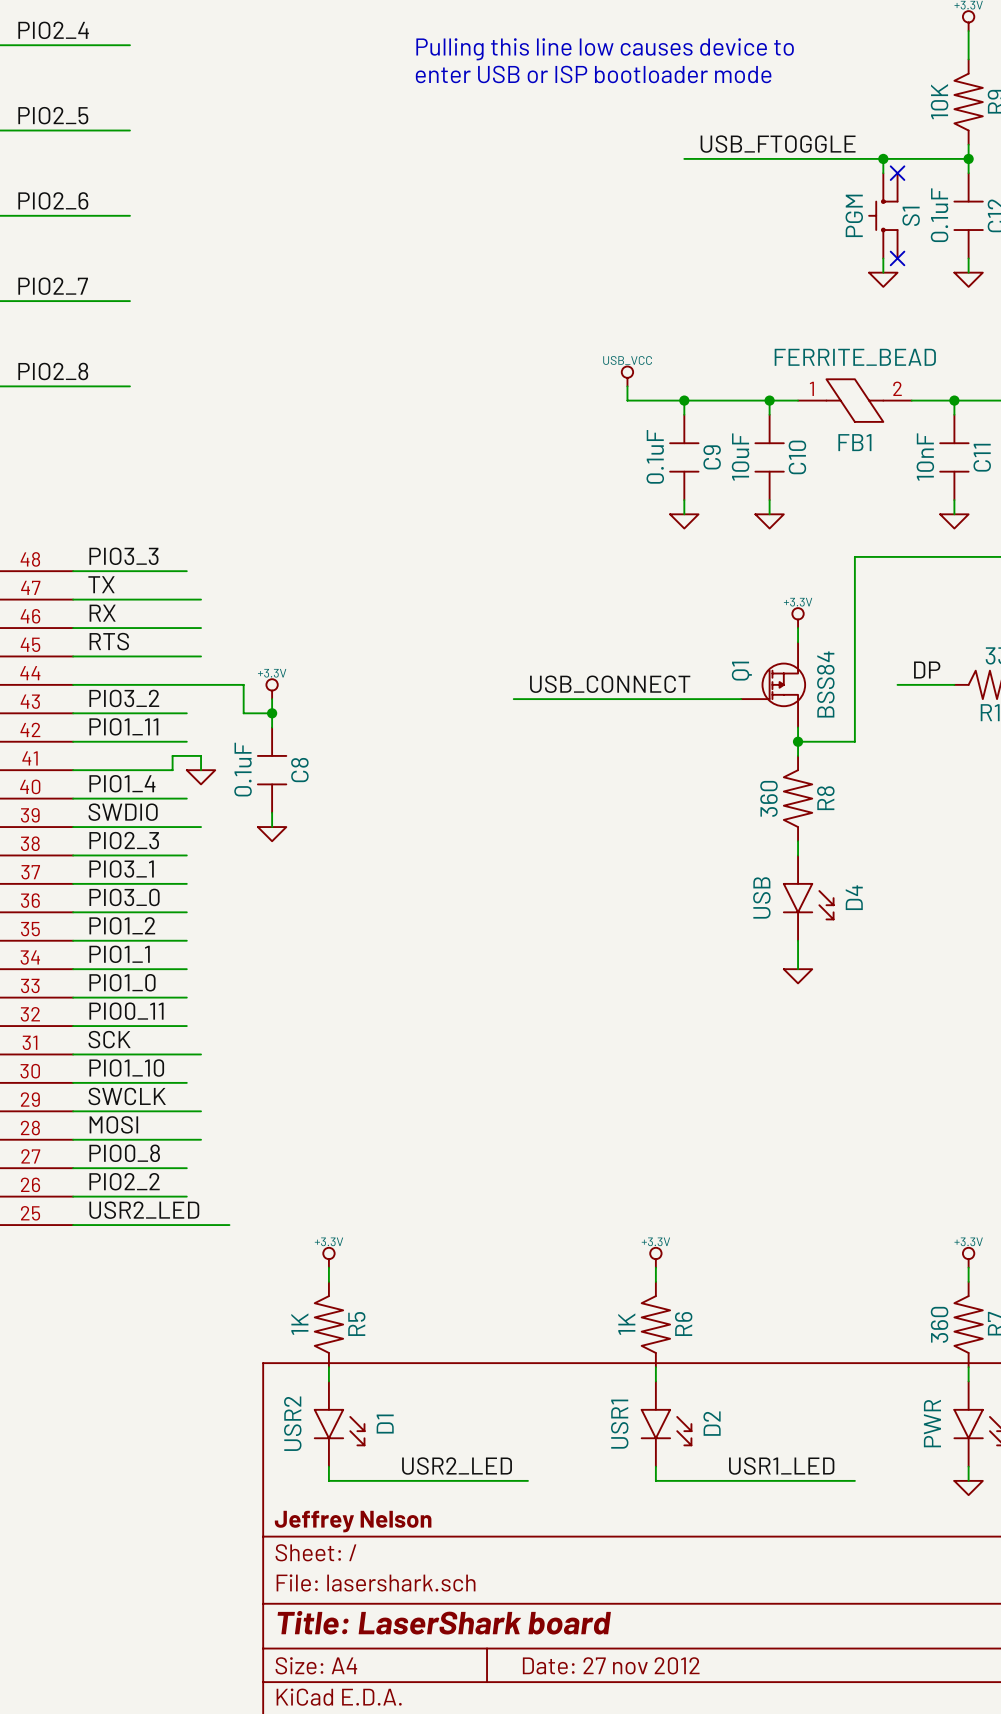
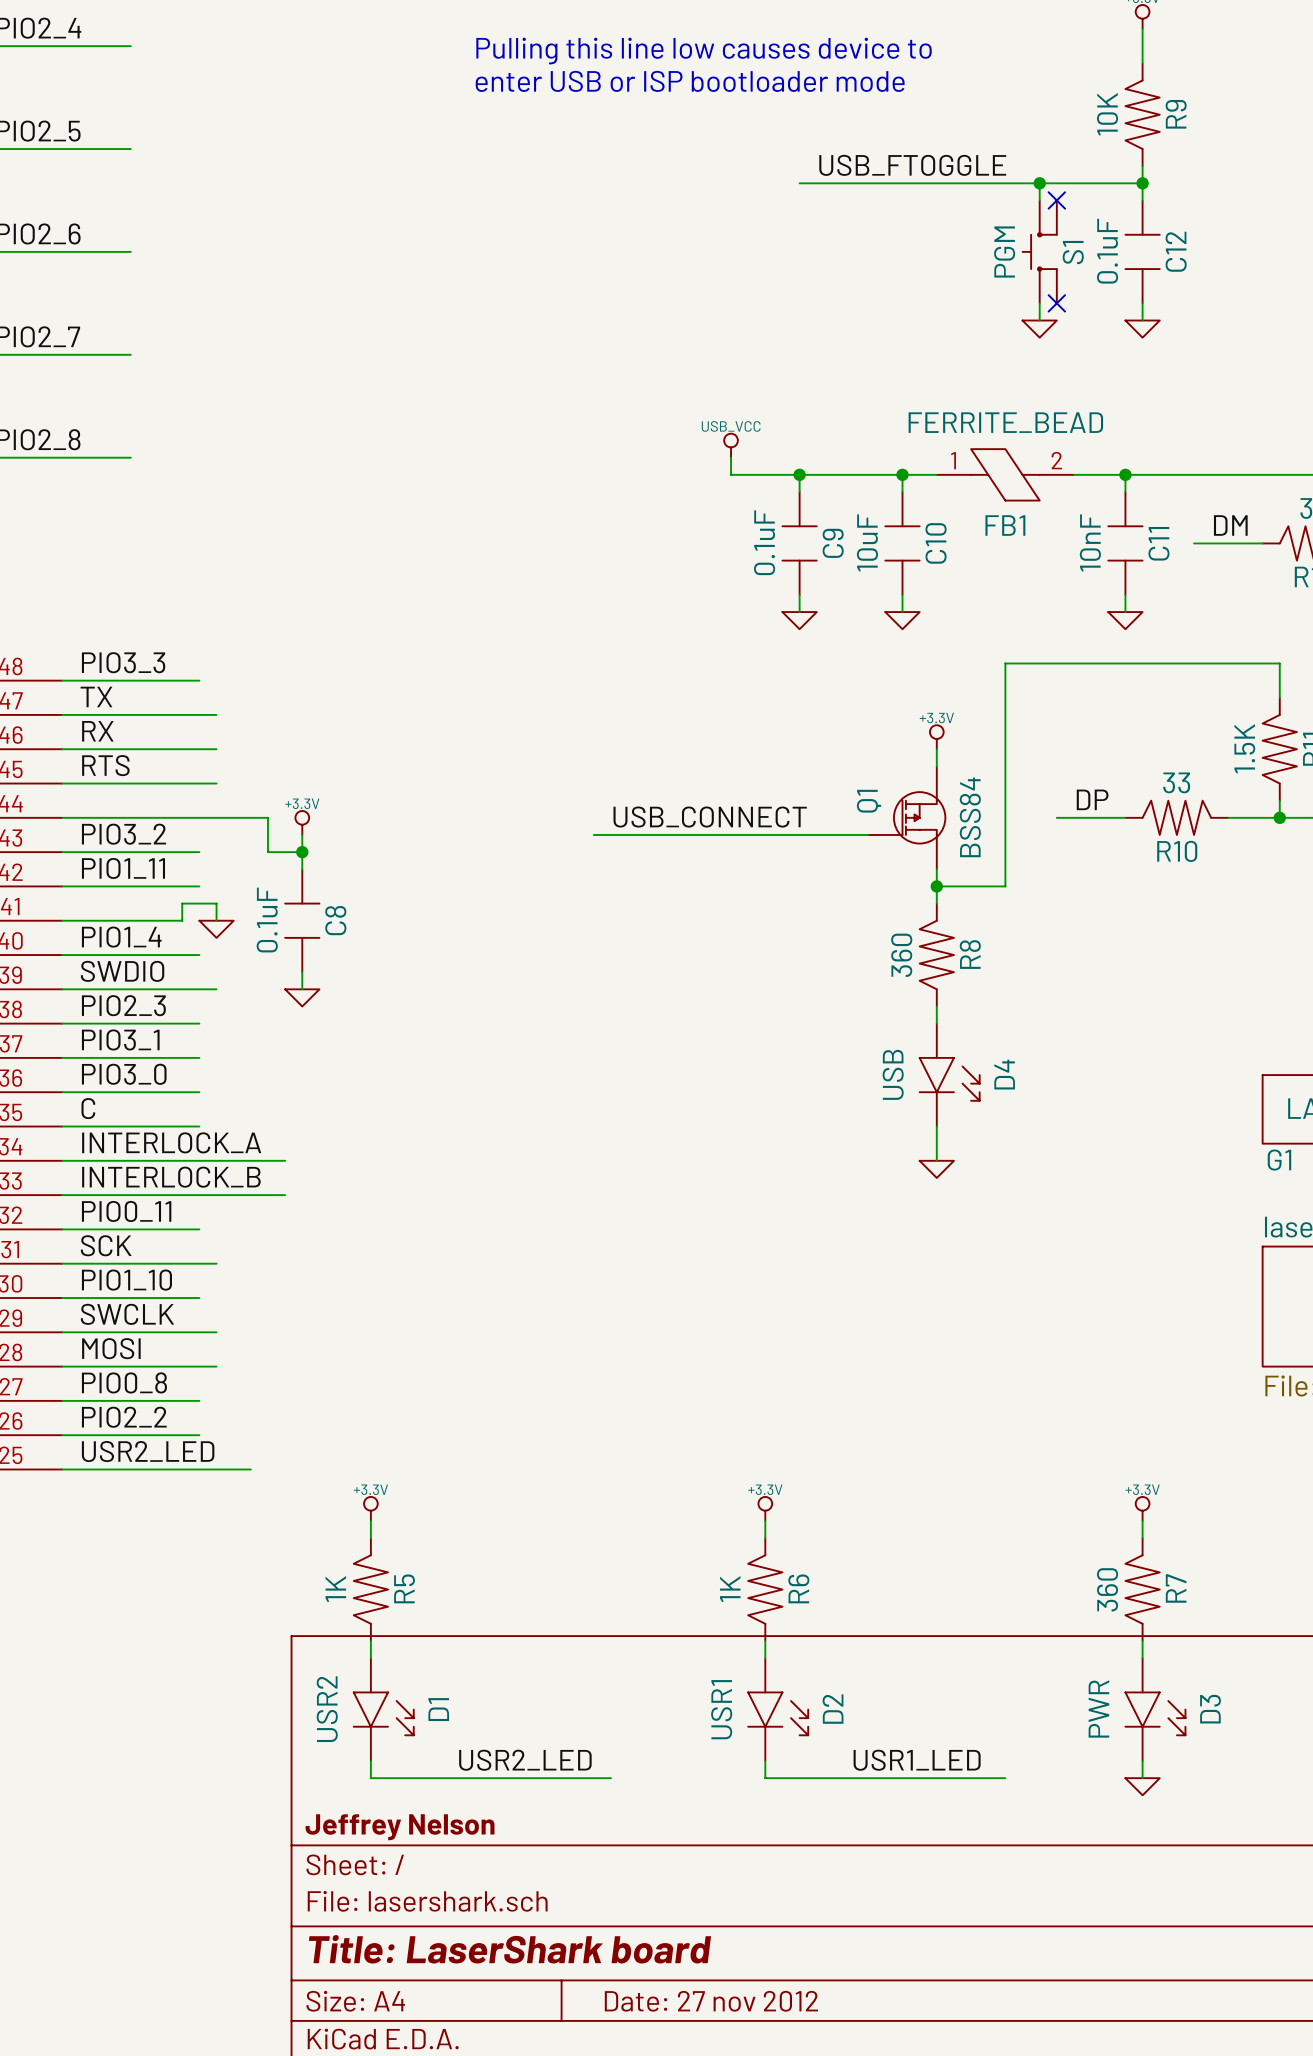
label: PIO1_2 (122, 925) -> C (88, 1108)
label: PIO1_1 (119, 954) -> INTERLOCK_A (171, 1142)
wire: none -> (199, 1160) (285, 1160)
label: PIO1_0 (122, 982) -> INTERLOCK_B (171, 1177)
wire: none -> (199, 1195) (285, 1195)

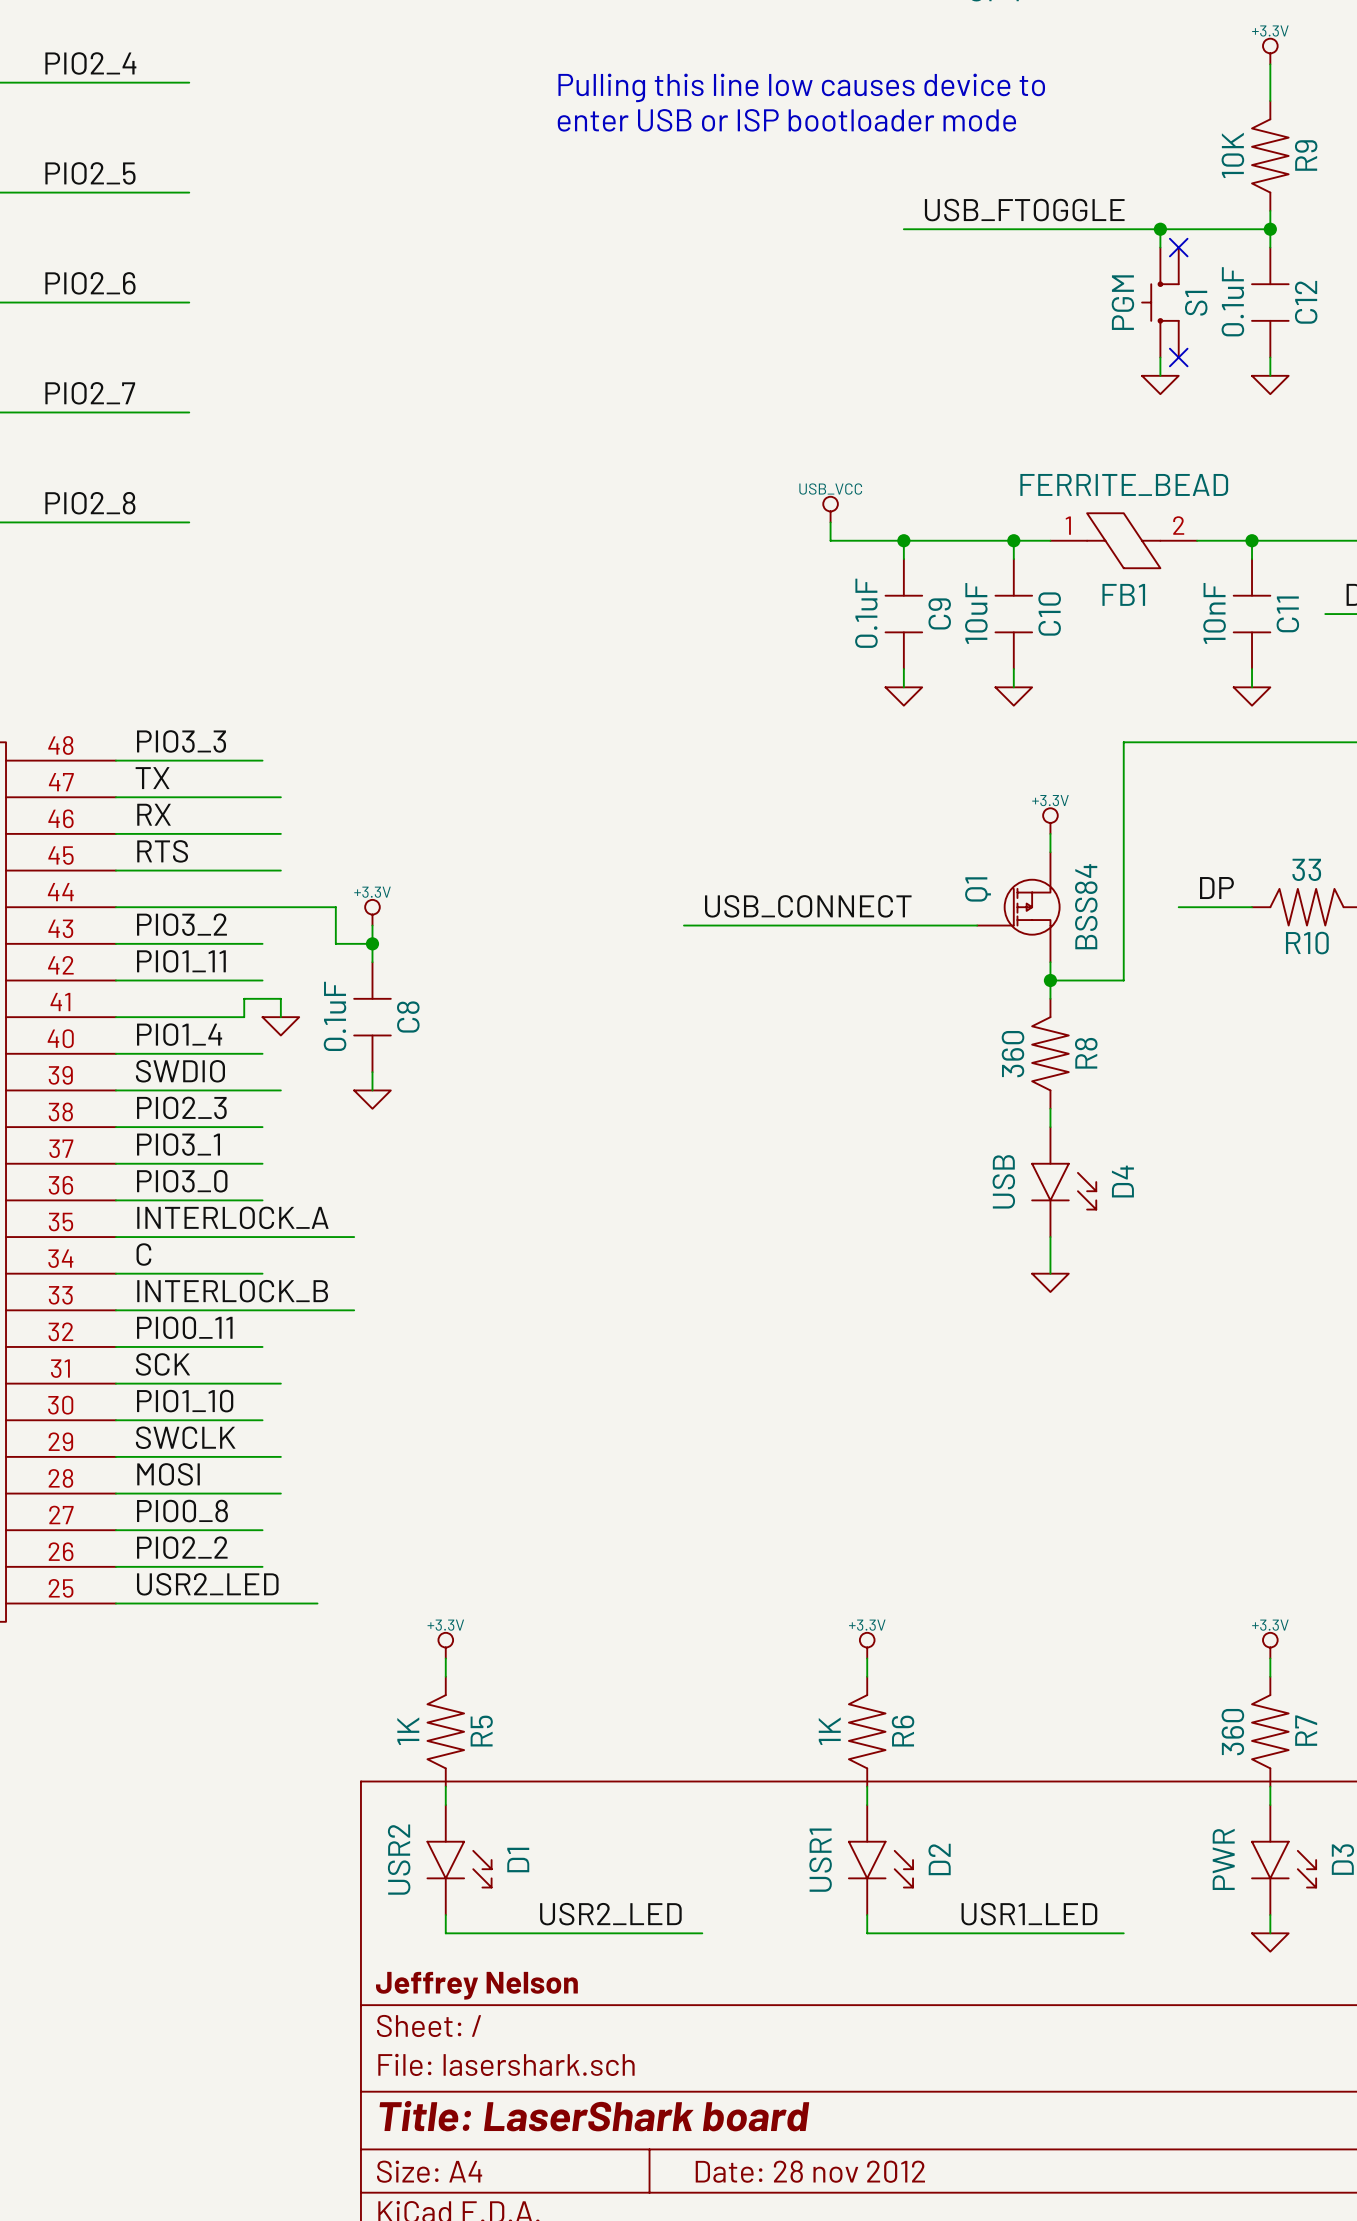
label: C (88, 1108) -> INTERLOCK_A (232, 1217)
label: INTERLOCK_A (171, 1142) -> C (143, 1254)
wire: (199, 1160) (285, 1160) -> (262, 1237) (354, 1237)
title block: Date: 27 nov 2012 (711, 2001) -> Date: 28 nov 2012 (810, 2171)

